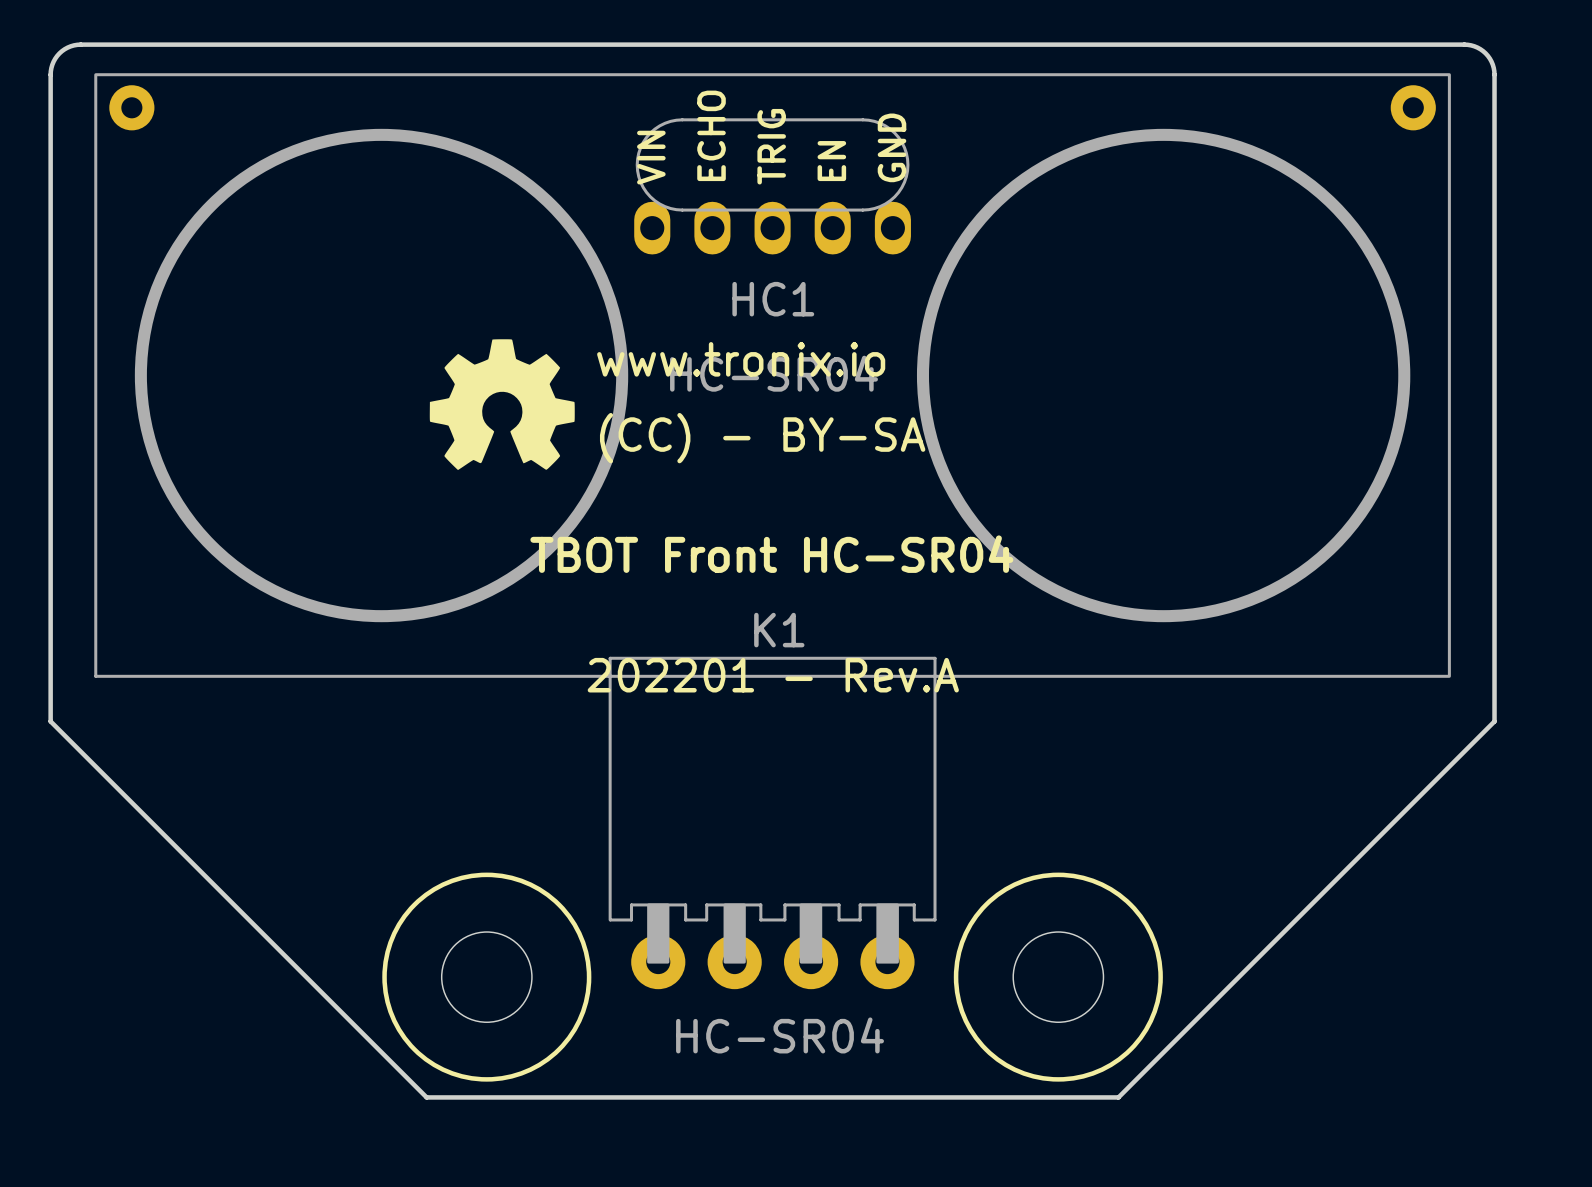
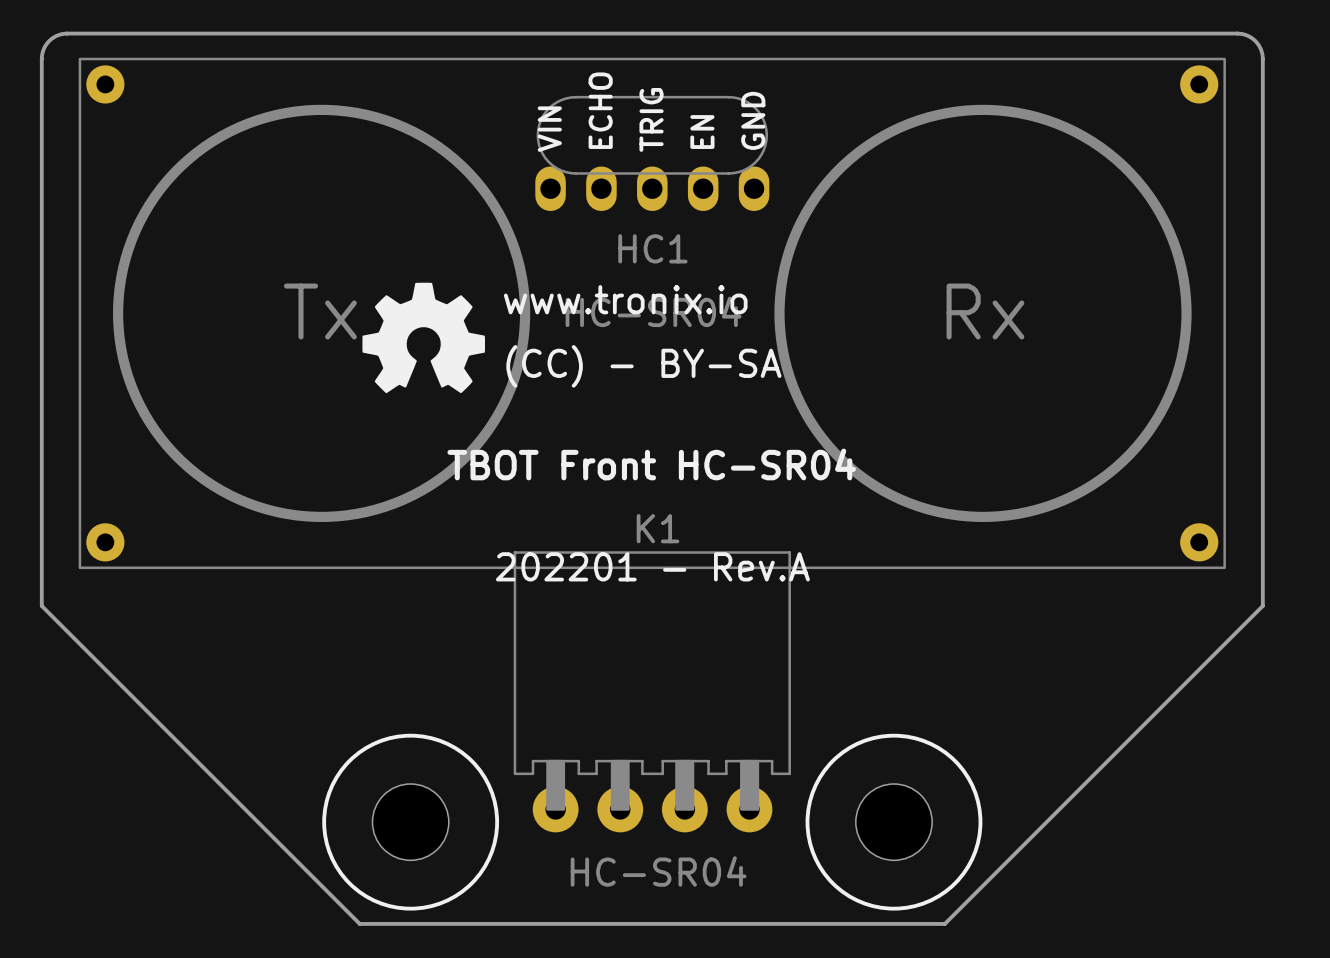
HC1 footprint: [94, 73, 1451, 678] -> [78, 57, 1226, 570]

